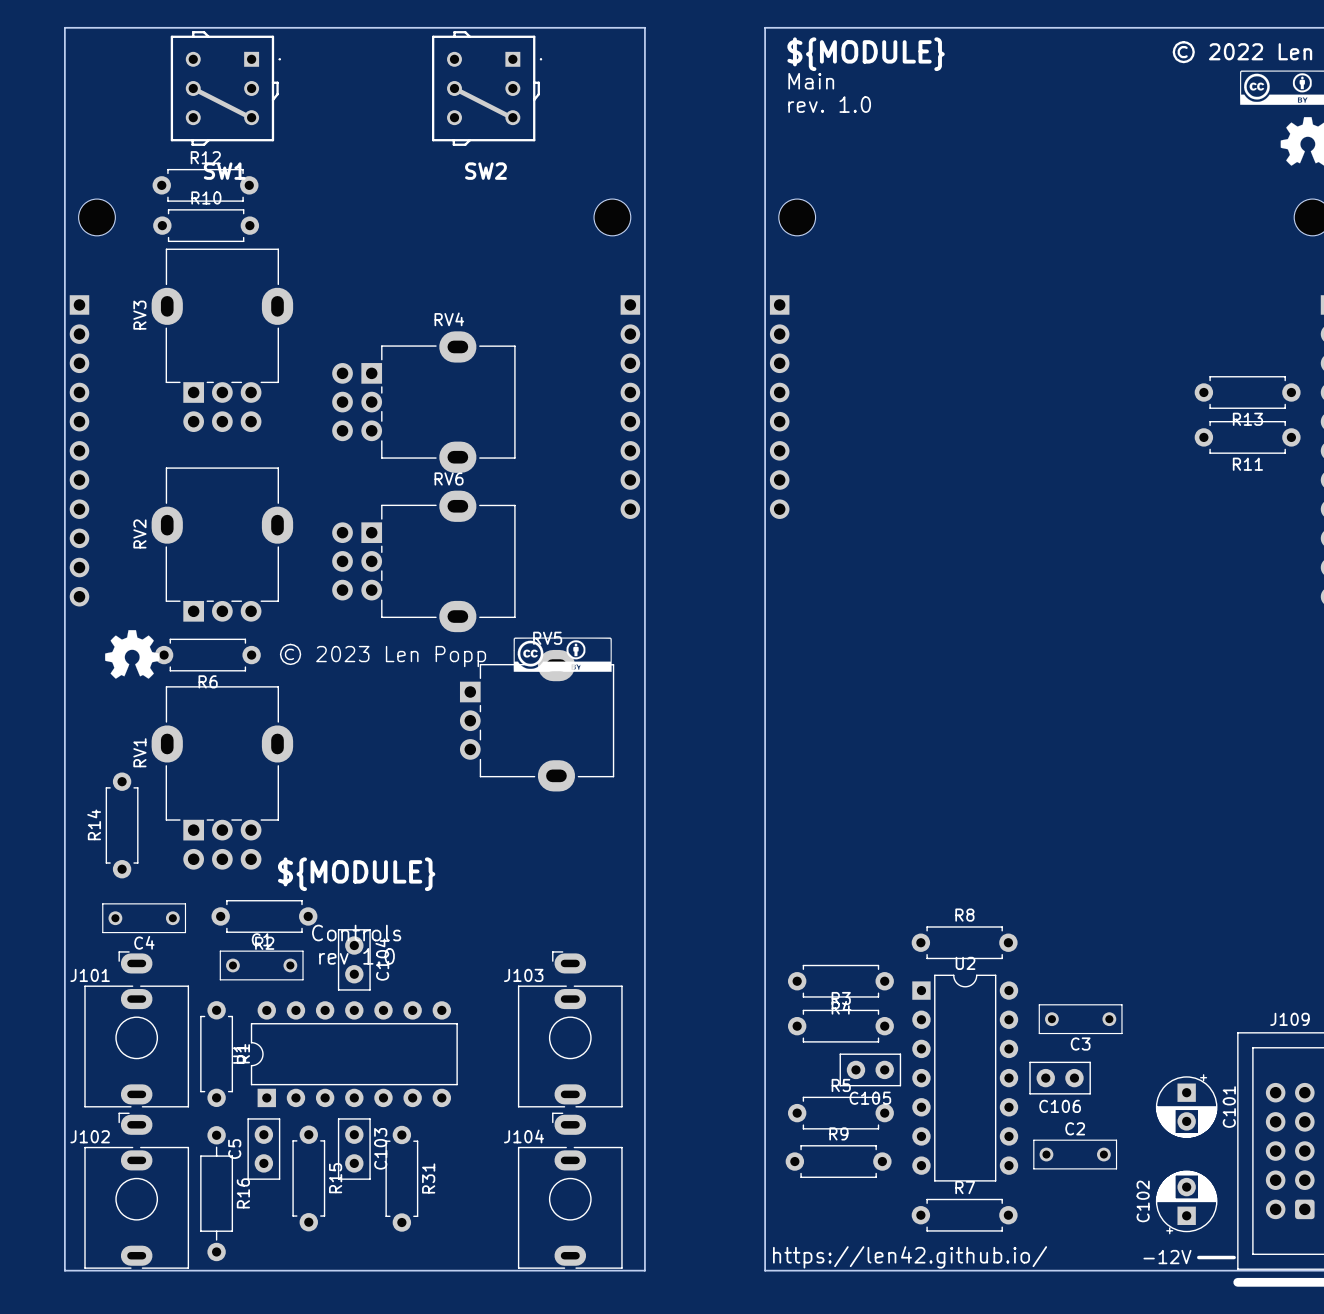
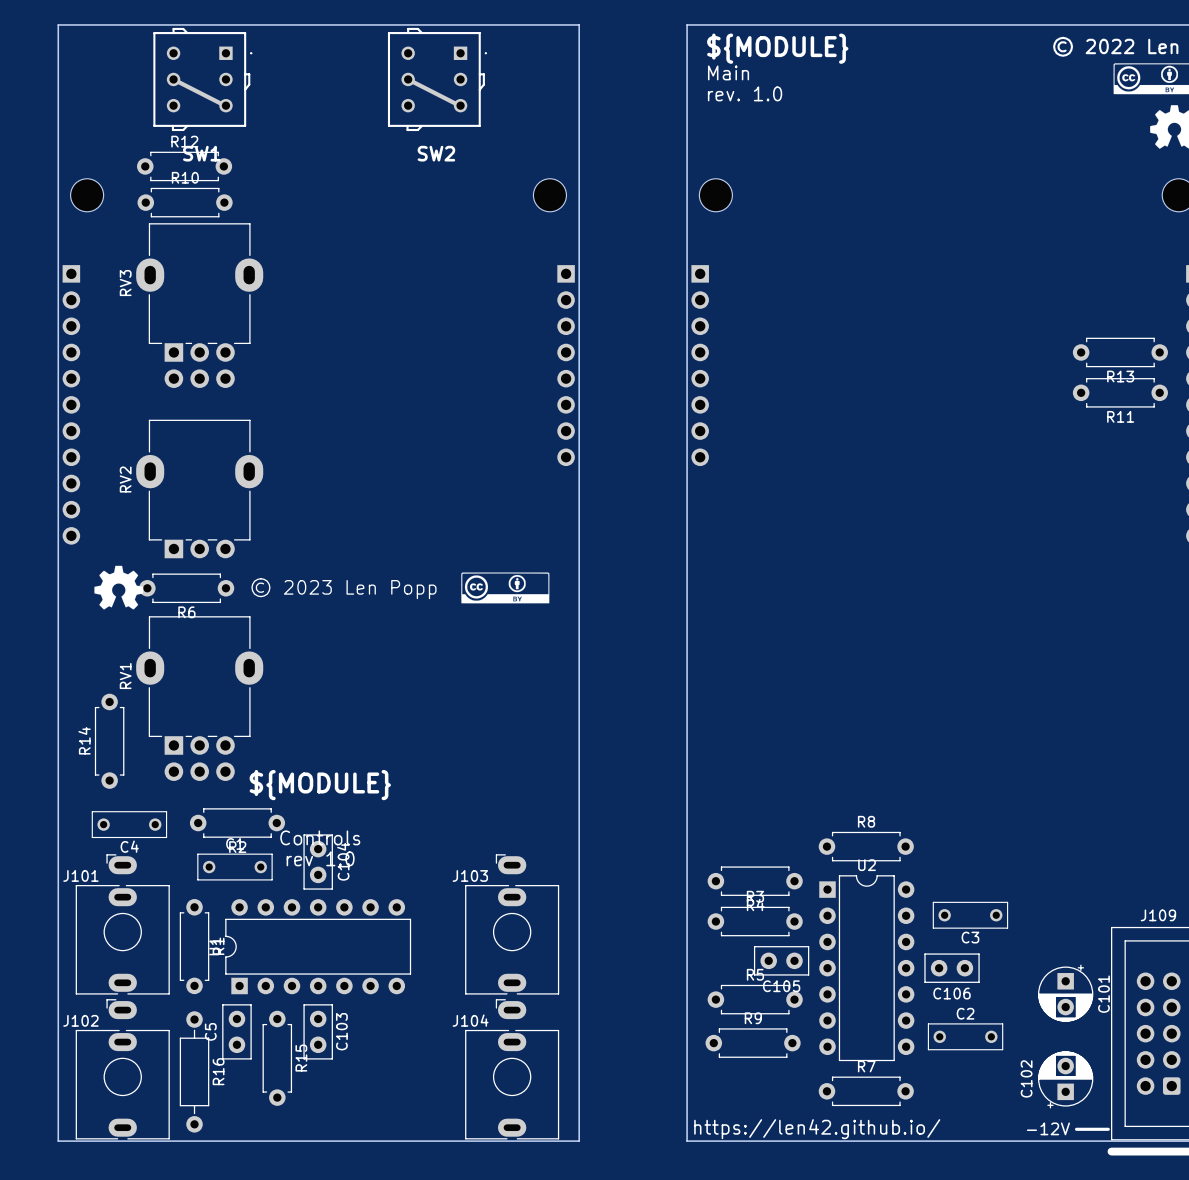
RV4: (423, 402) -> none
RV6: (423, 561) -> none
RV5: (537, 720) -> none
R31: (401, 1178) -> none

